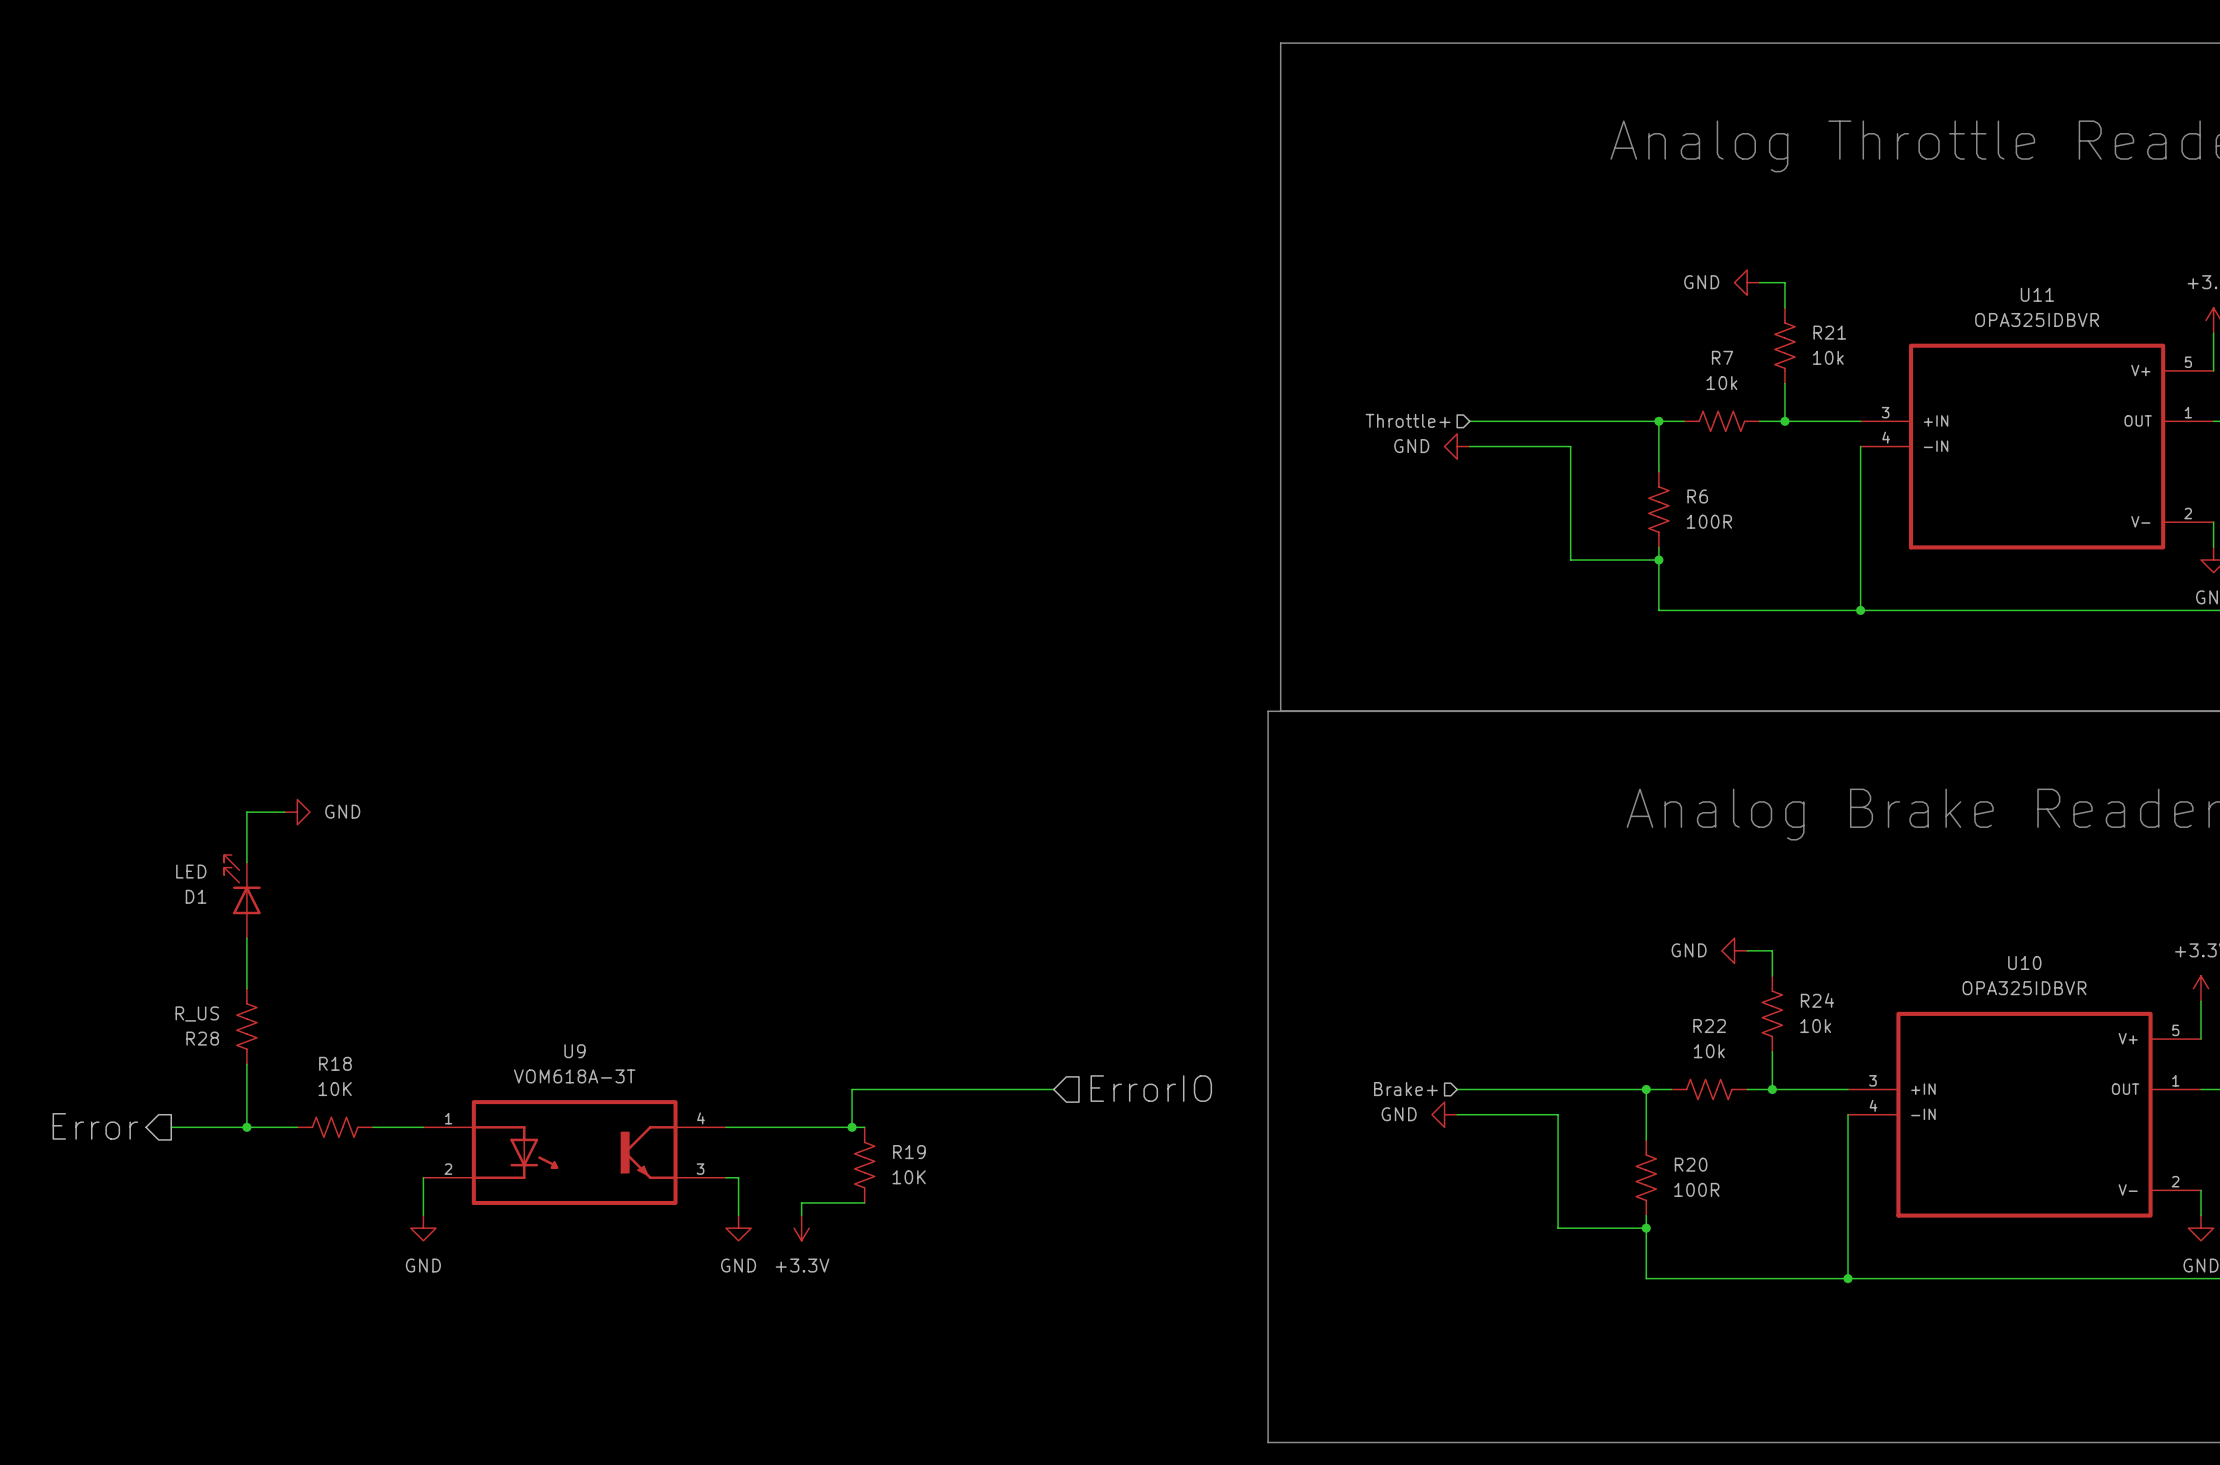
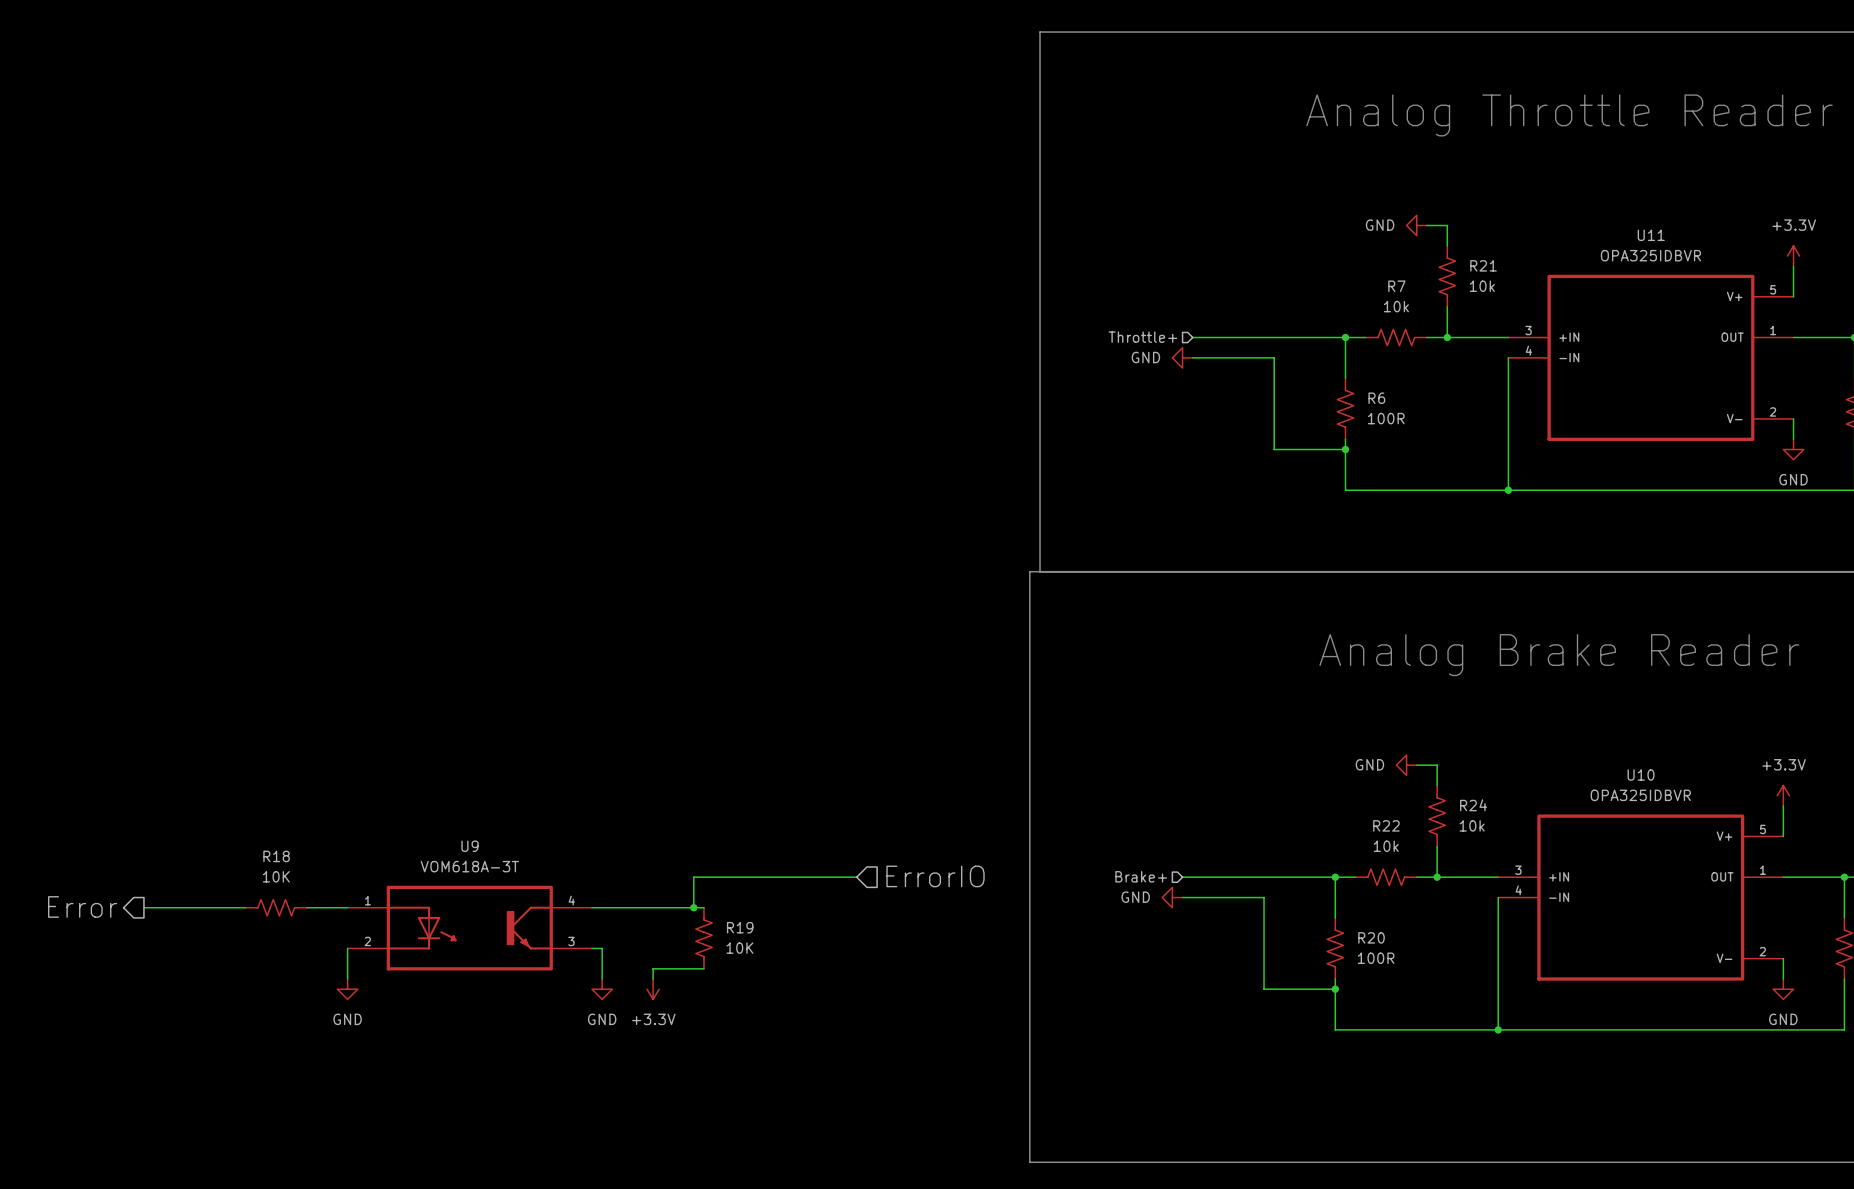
wire: (284, 812) (246, 812) (246, 862) -> none
power symbol: GND (297, 812) -> none
D1: LED (242, 896) -> none
wire: (246, 938) (246, 988) -> none
R28: R_US (246, 1026) -> none
wire: (246, 1064) (246, 1127) -> none
junction: (246, 1127) -> none

